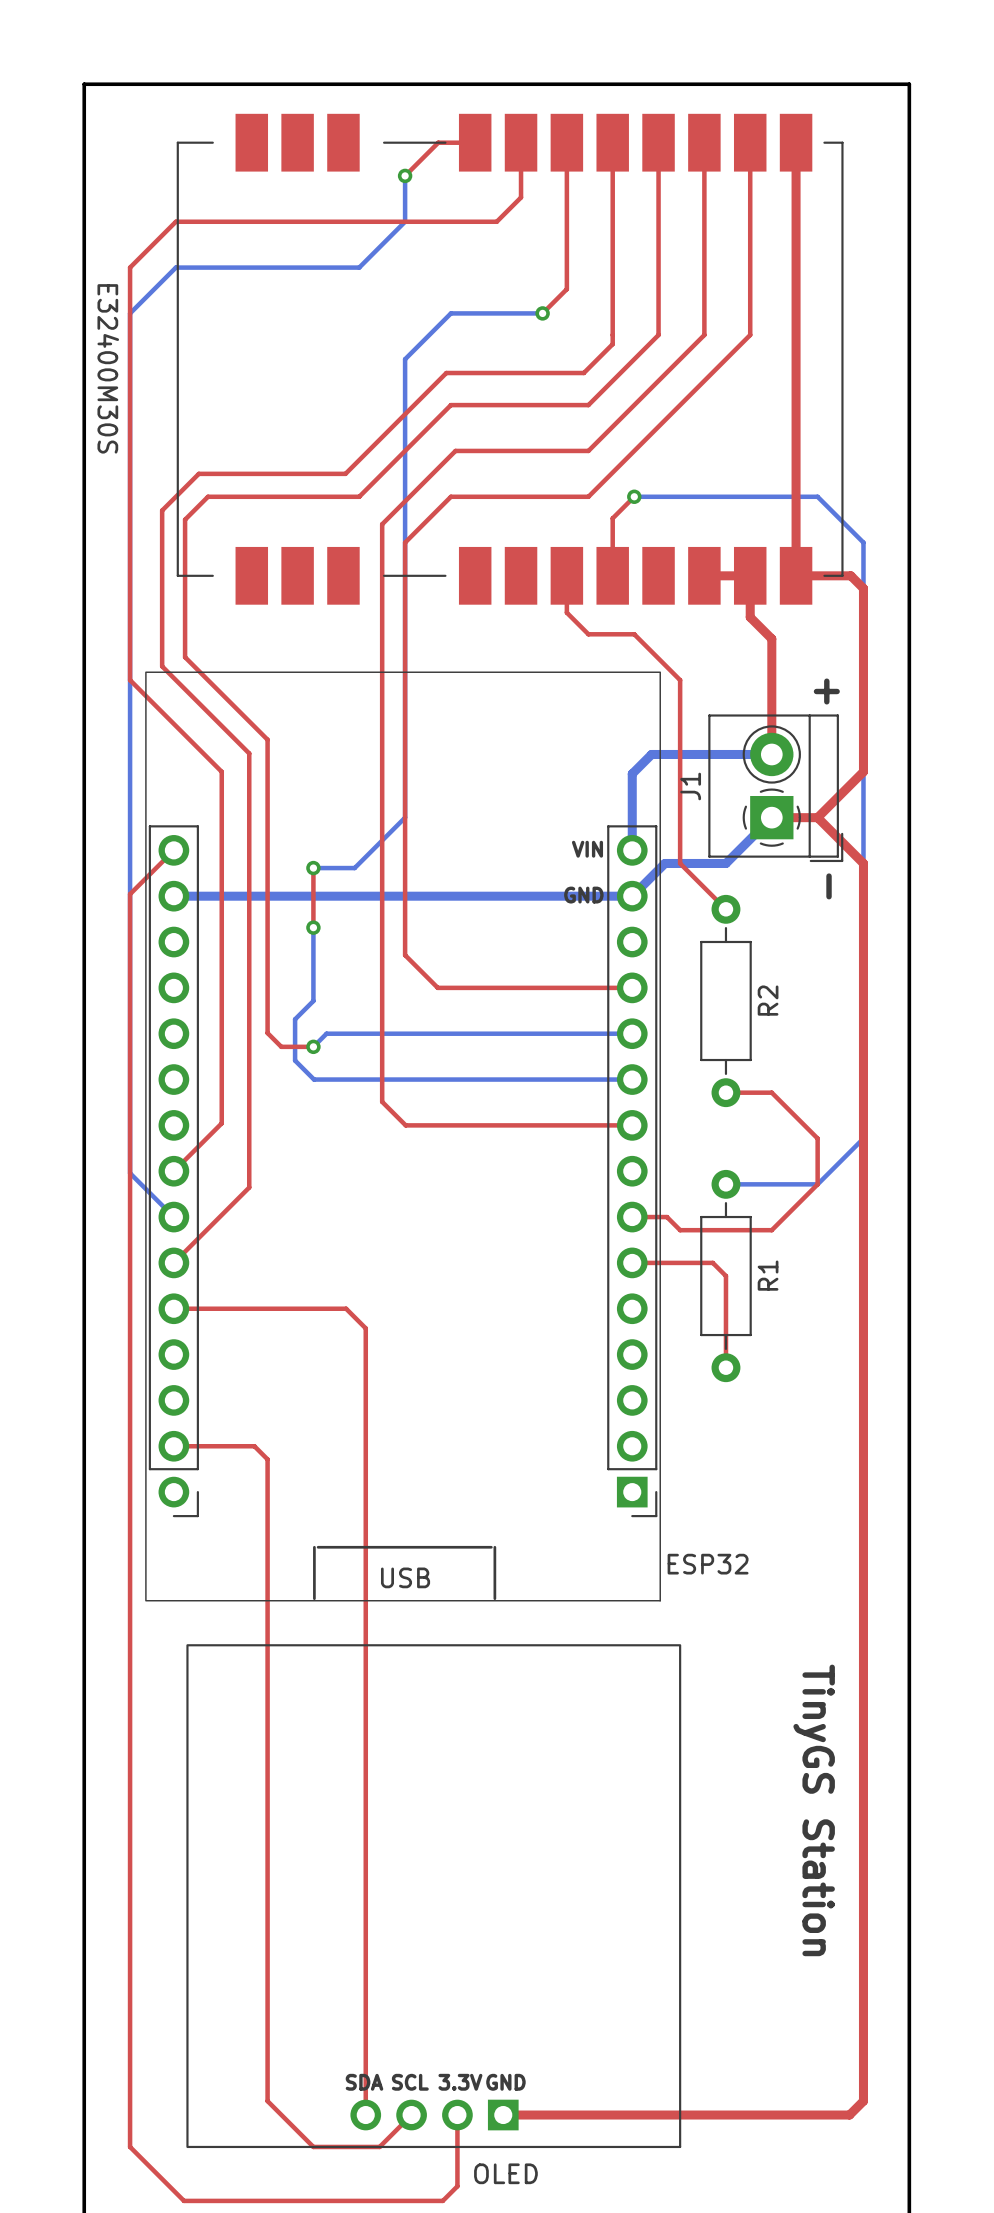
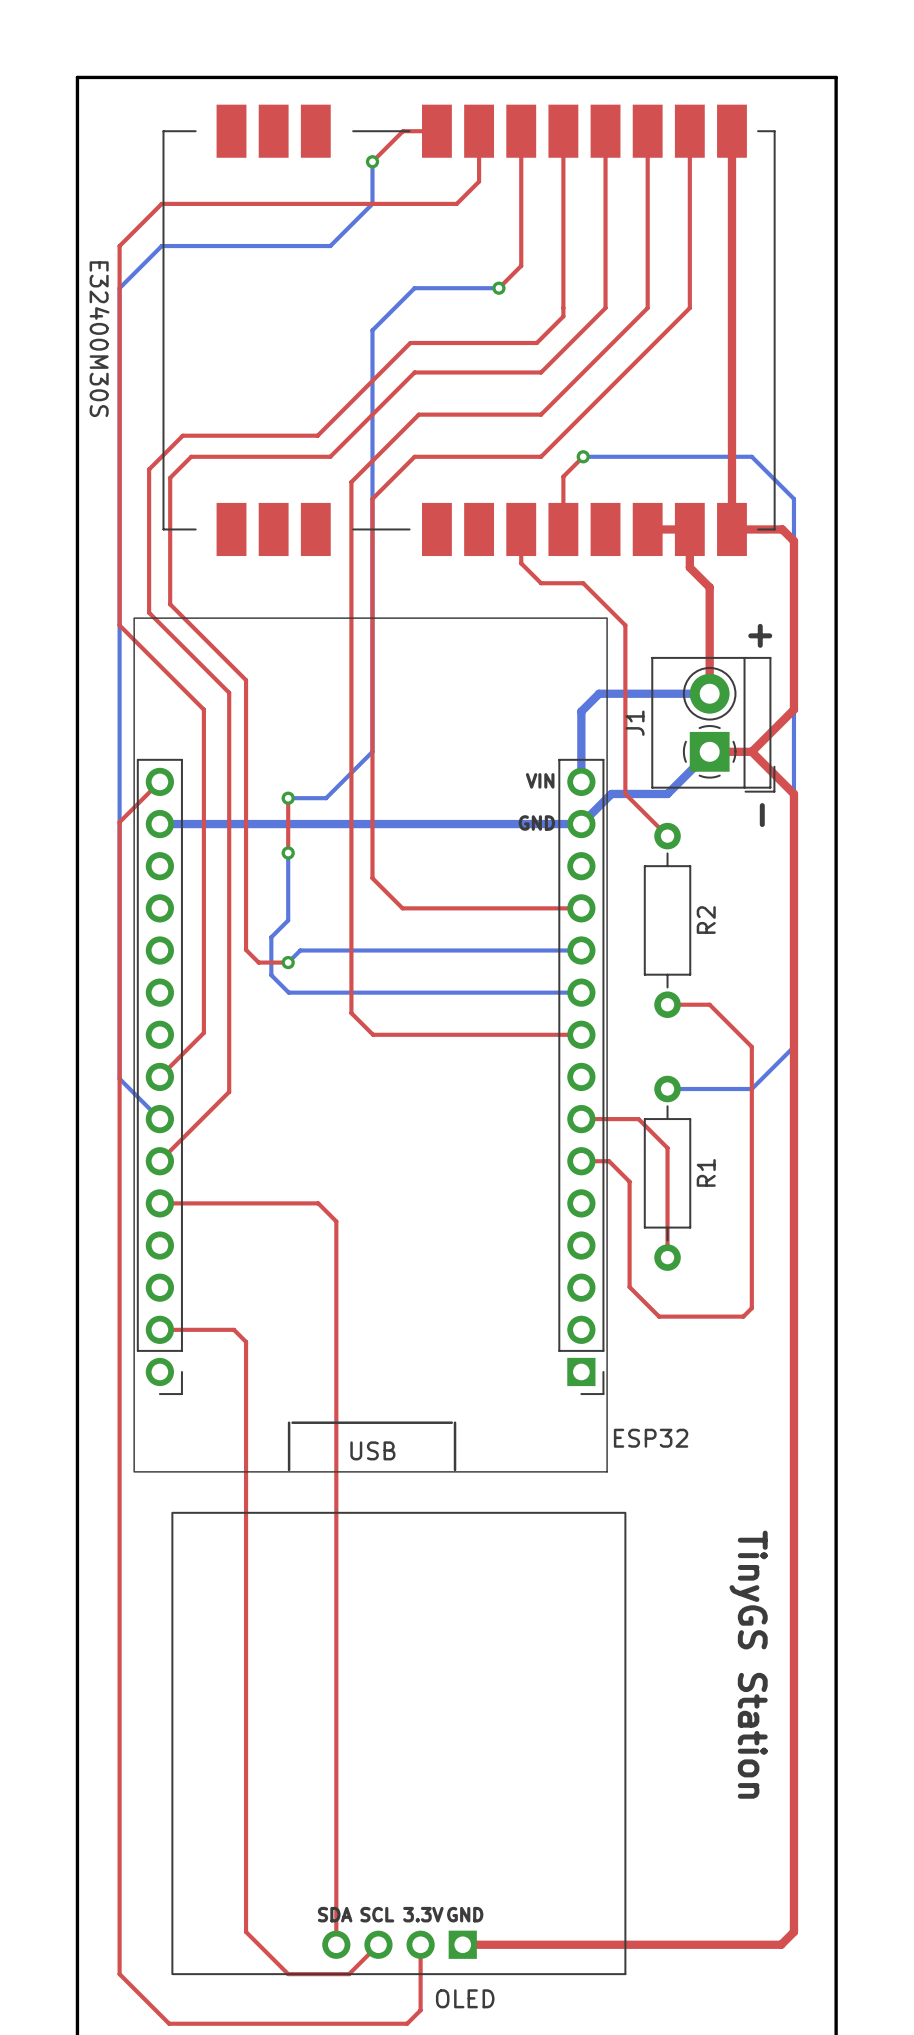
top track: (817, 1184) (771, 1230) (680, 1230) (667, 1217) -> (751, 1089) (751, 1308) (743, 1316) (659, 1316) (629, 1287) (629, 1181) (609, 1161)
top track: (662, 1262) (712, 1262) (725, 1276) -> (613, 1119) (638, 1119) (667, 1148) (667, 1173)

